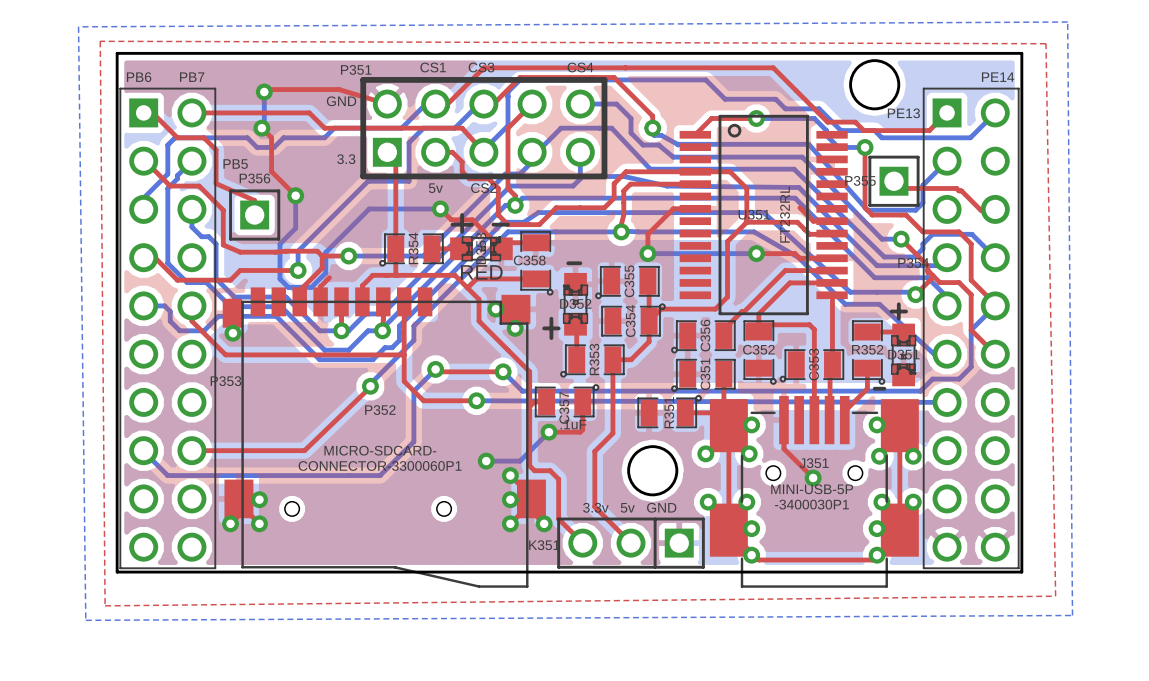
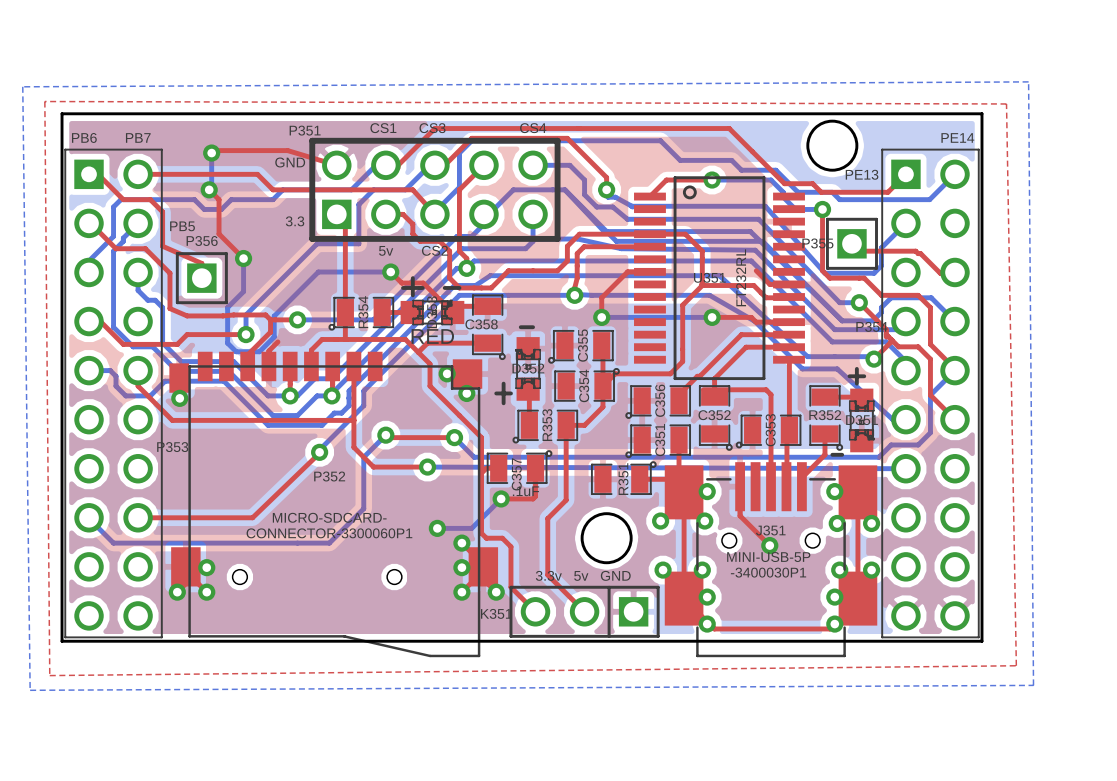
bottom track: none -> (564, 189) (616, 241) (762, 241) (842, 320)

